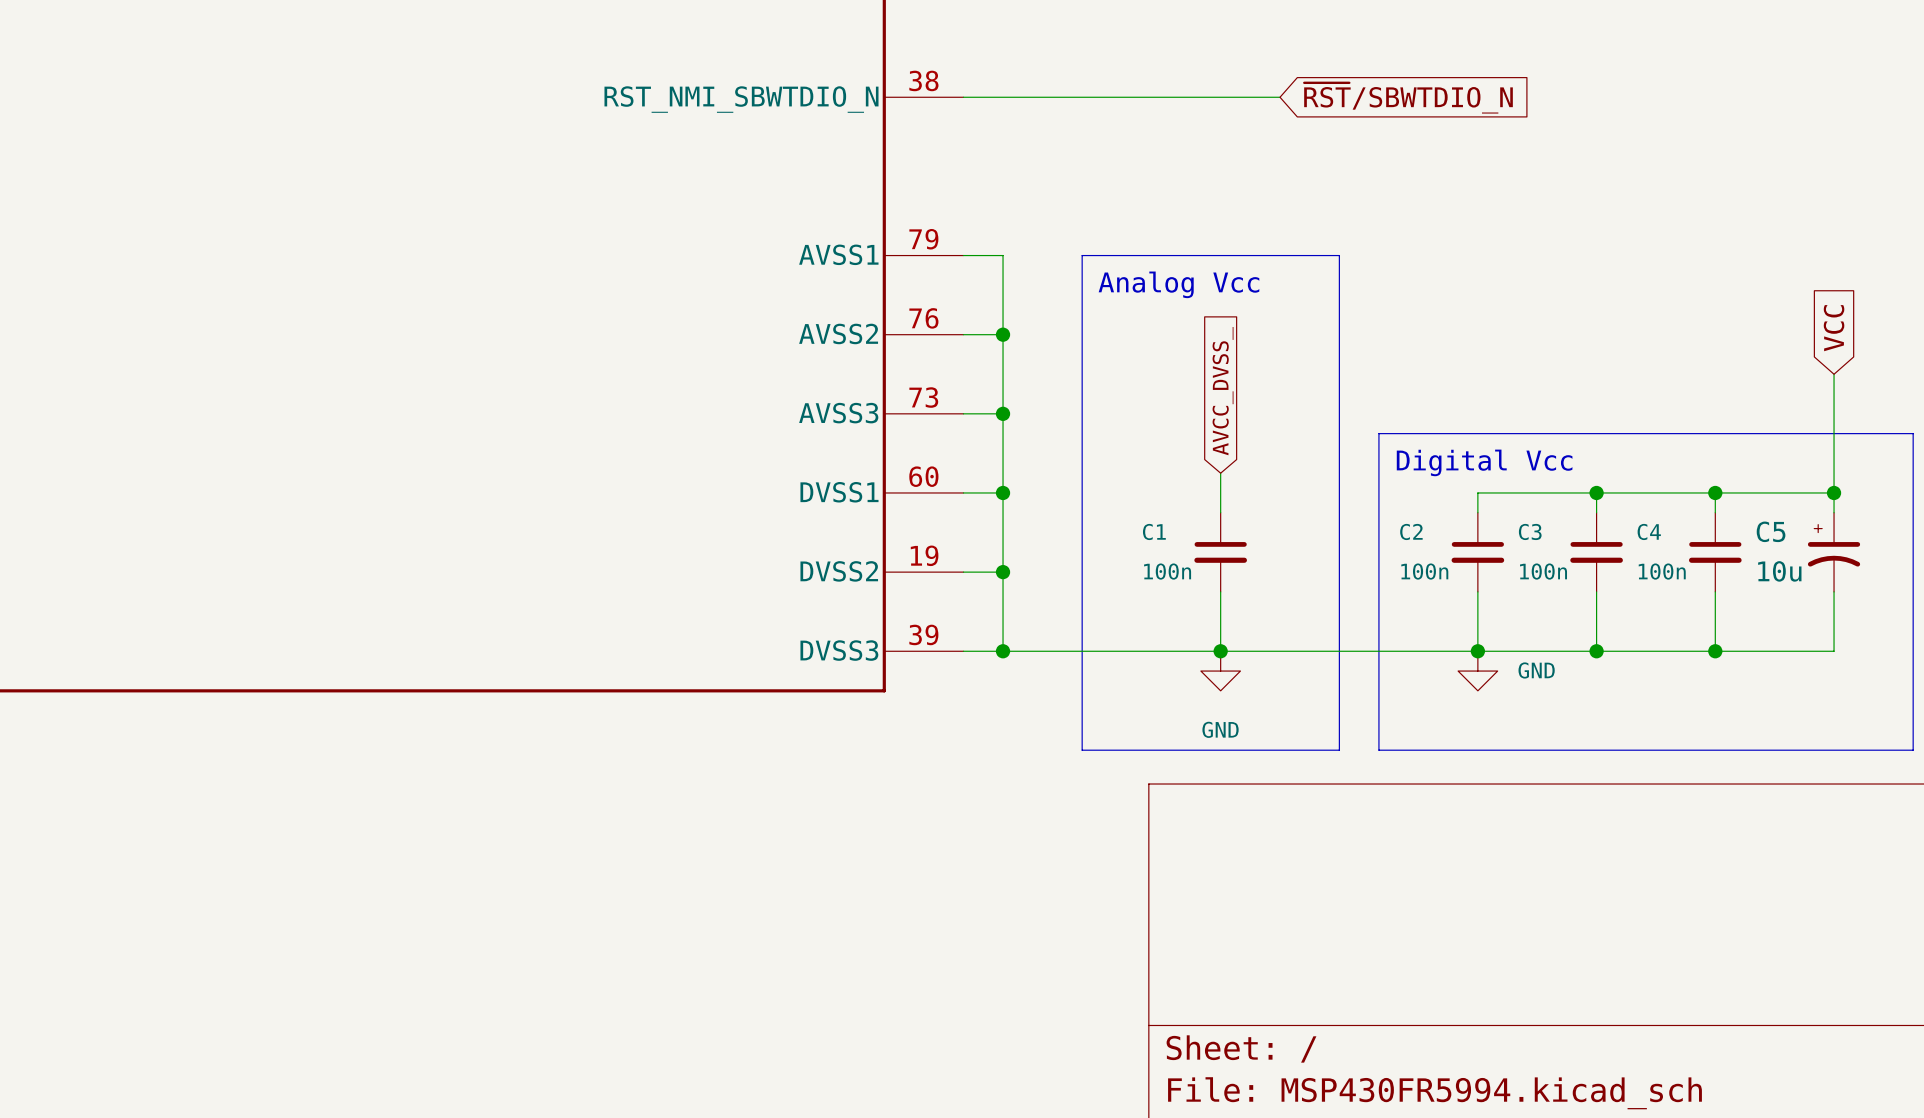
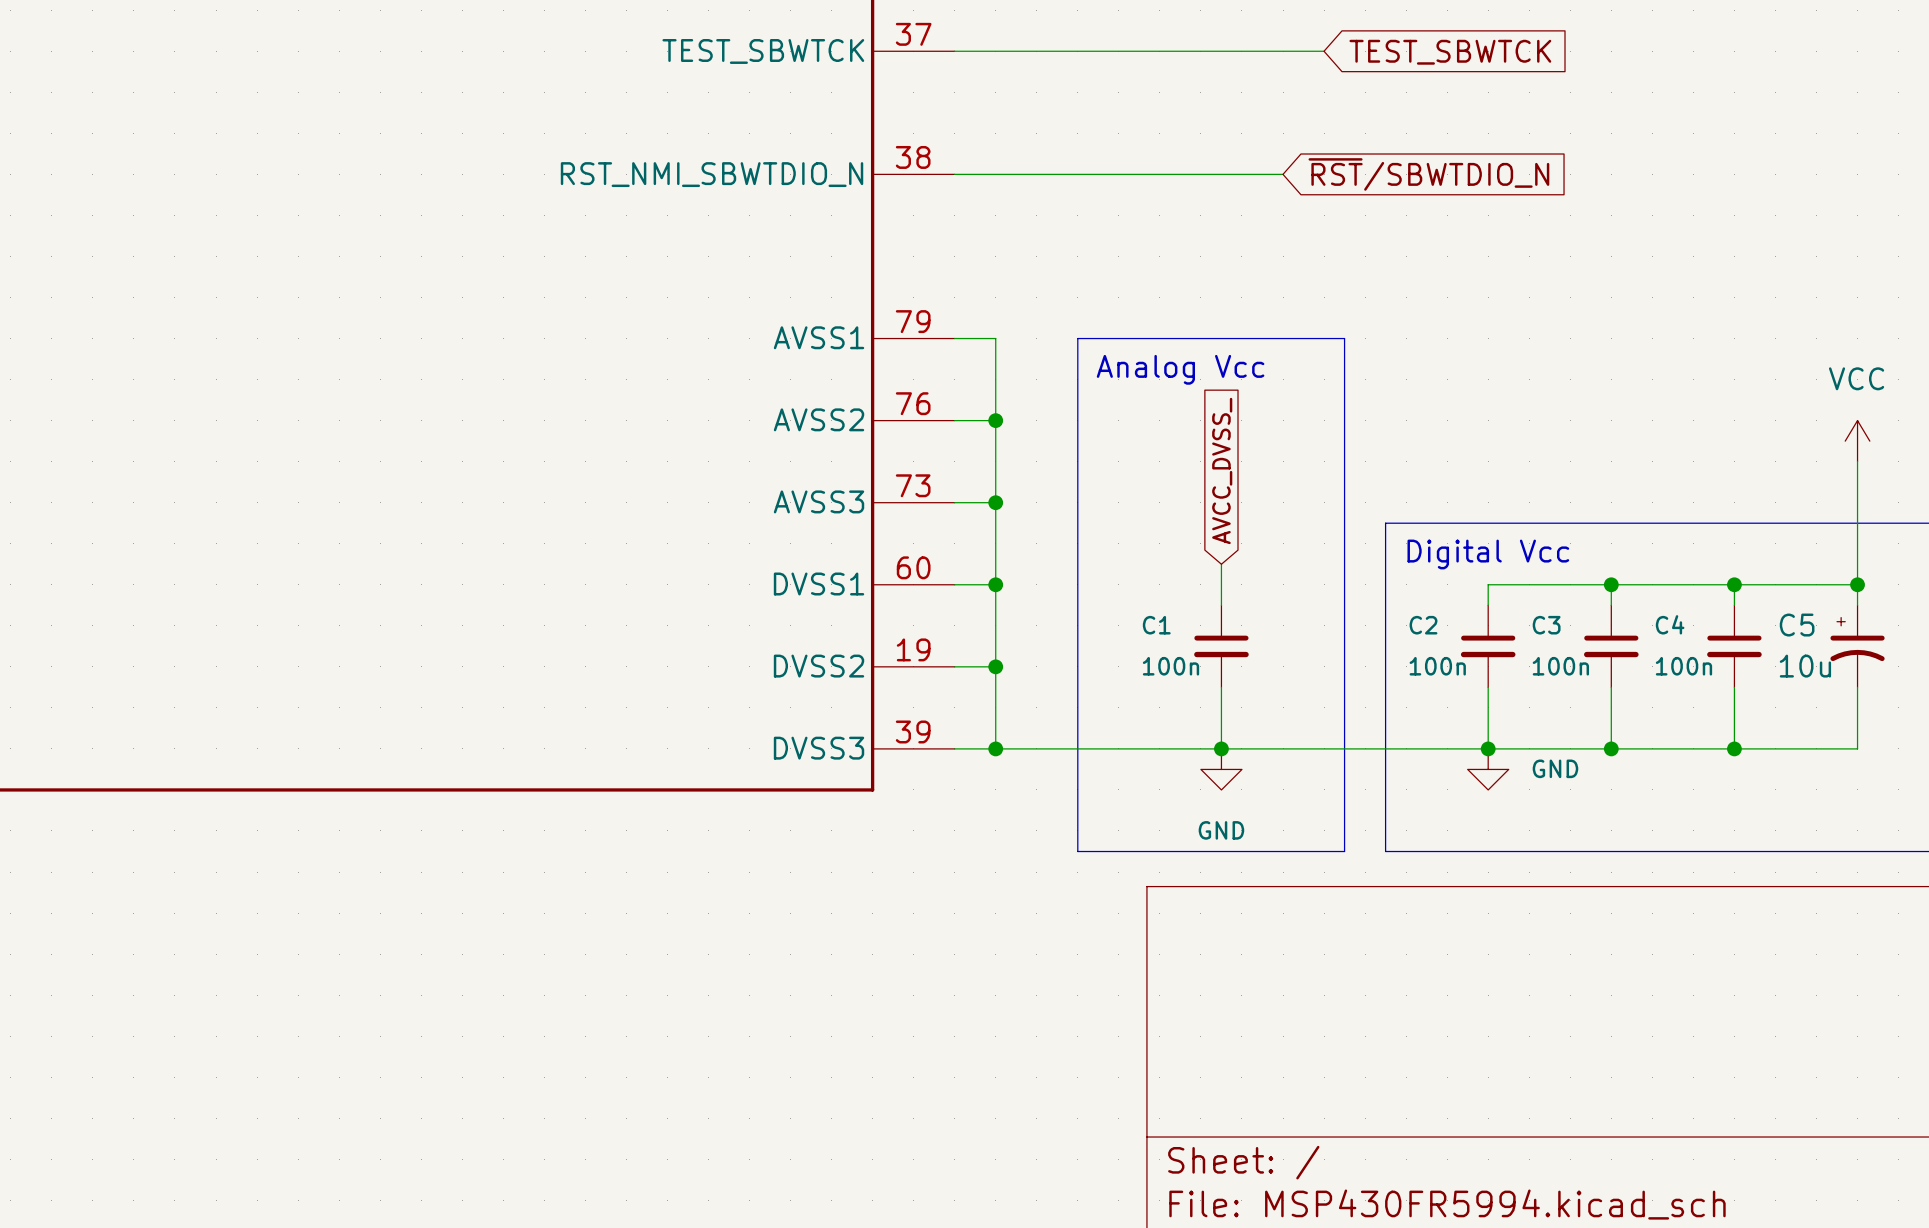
global label: VCC (1834, 328) -> none
power symbol: none -> VCC (1857, 441)

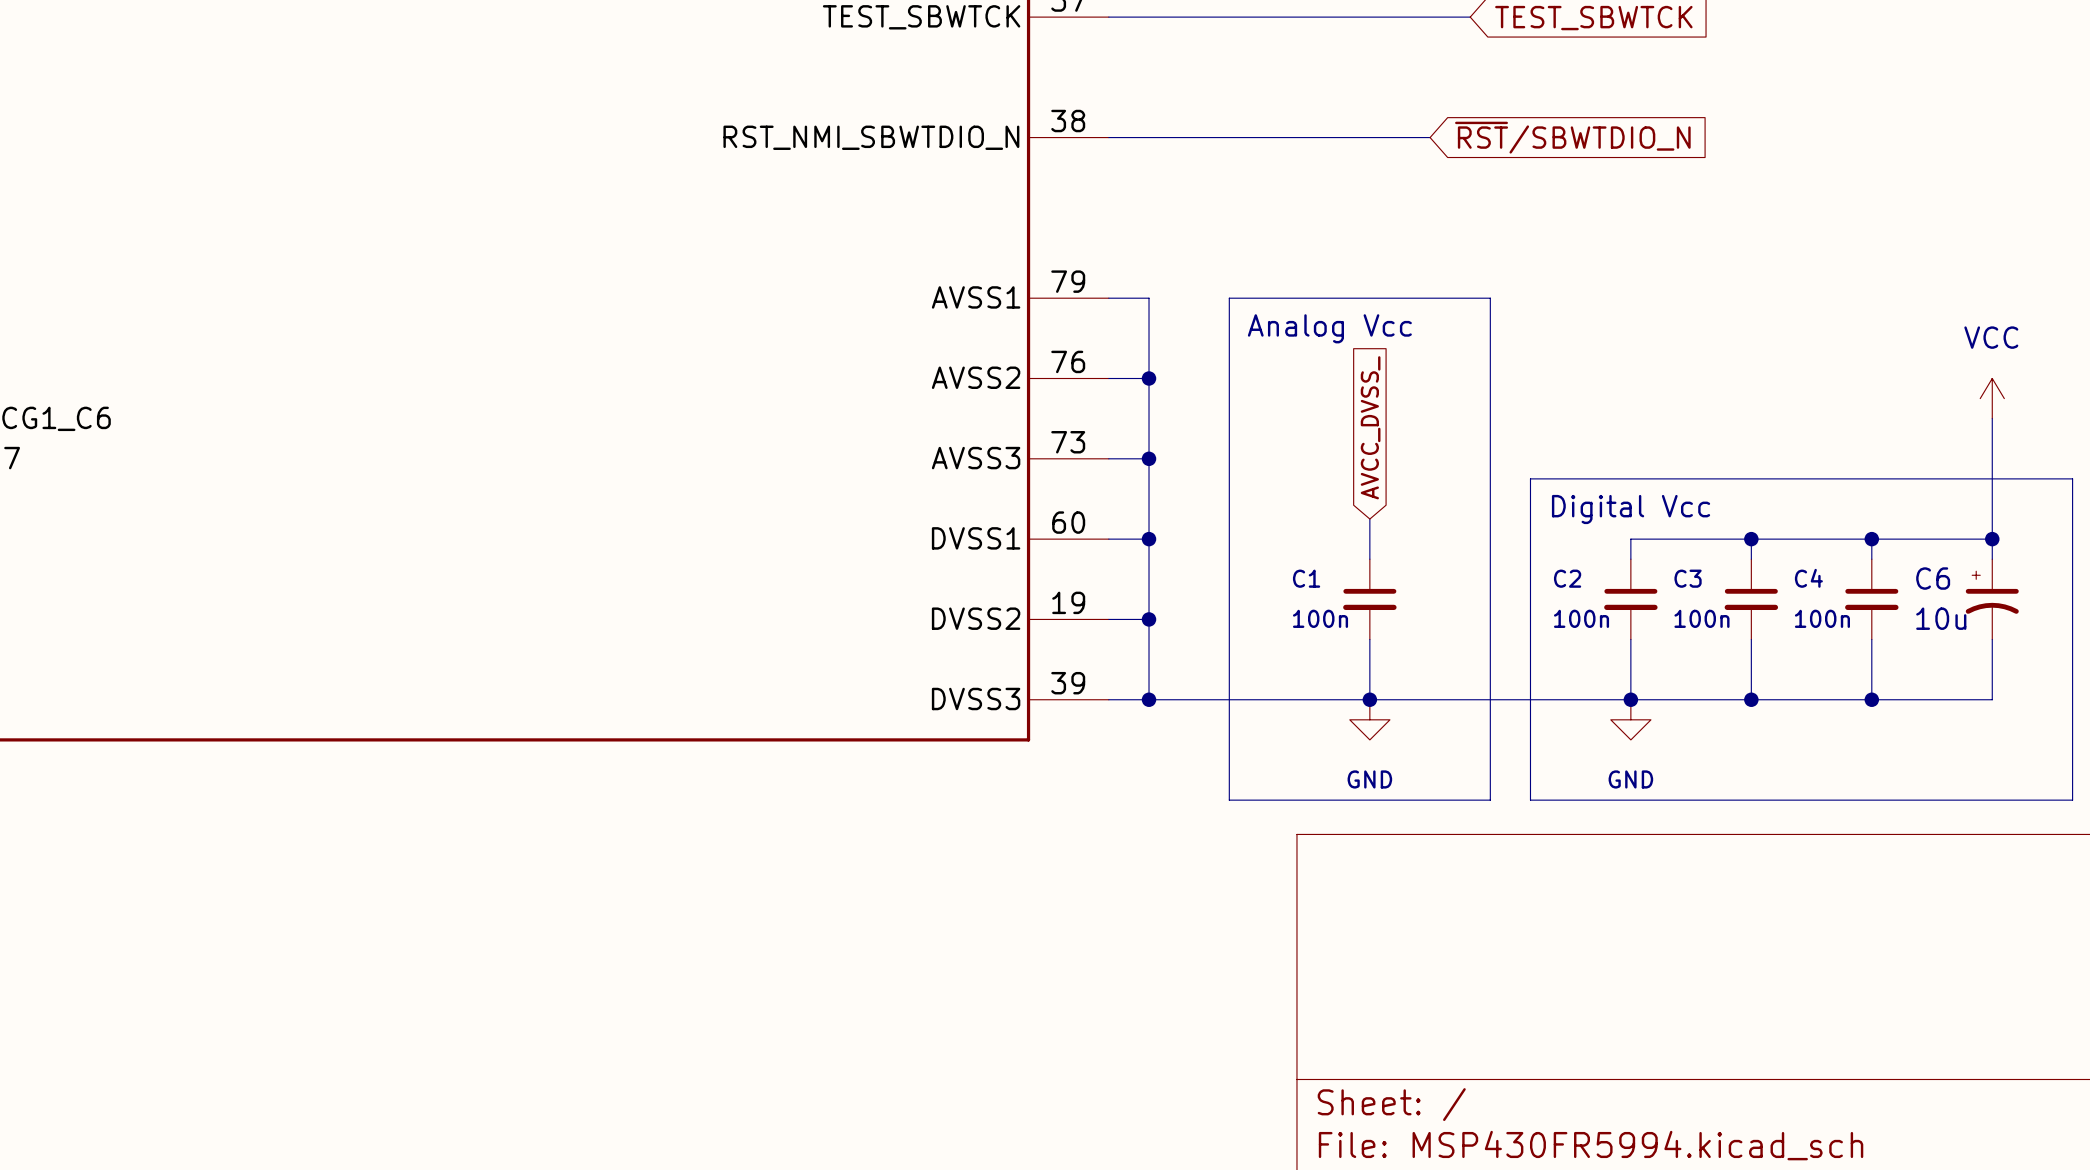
C5 name: C5 (1797, 625) -> C6 (1933, 578)
power symbol text position: GND (1555, 768) -> GND (1630, 779)

